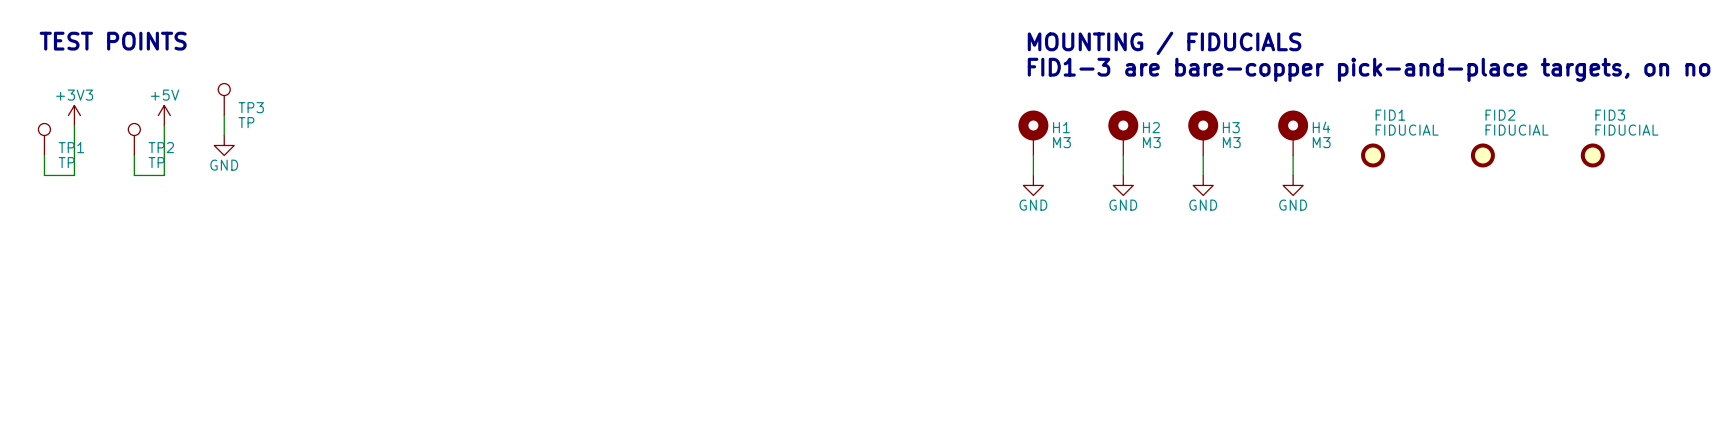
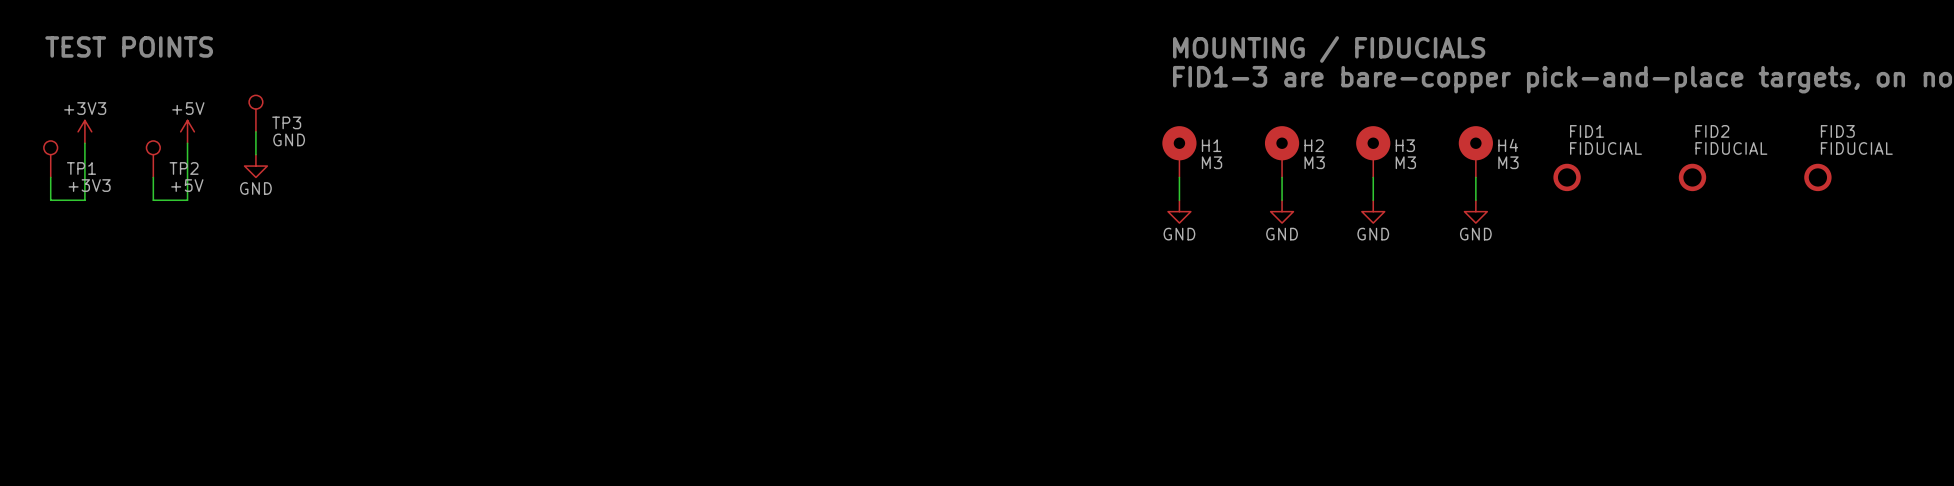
TP3 value: TP (246, 122) -> GND (289, 139)
TP1 value: TP (66, 162) -> +3V3 (89, 185)
TP2 value: TP (156, 162) -> +5V (187, 185)

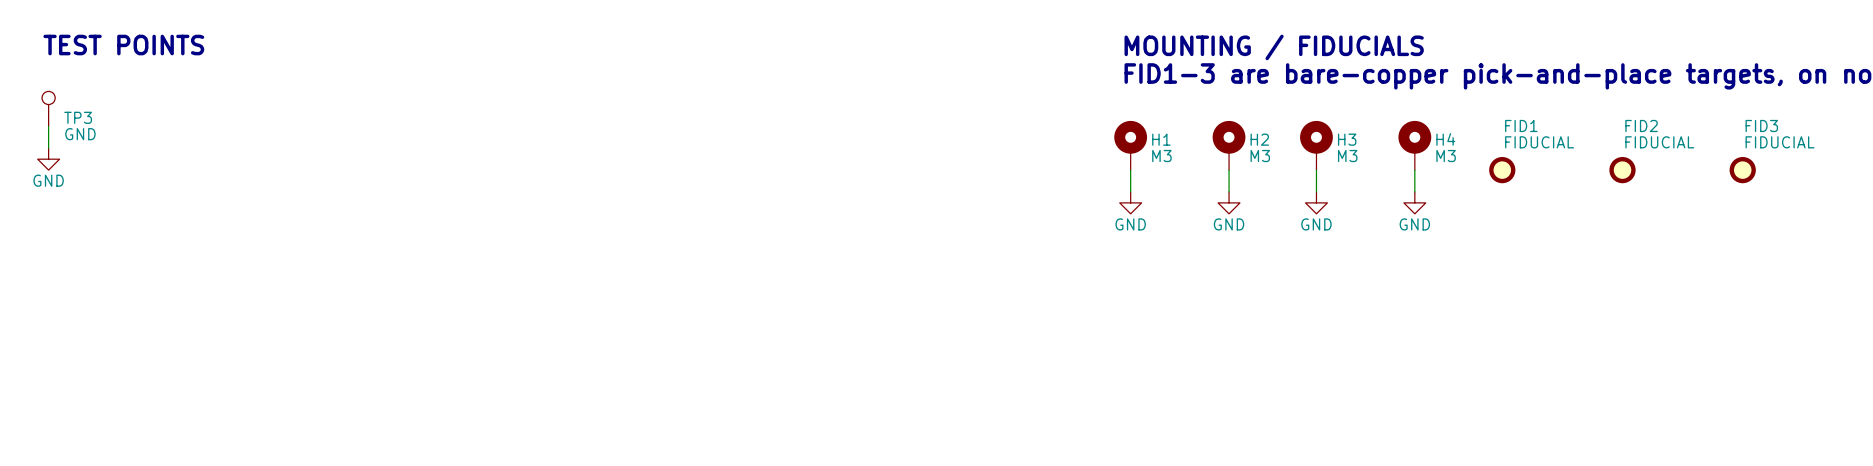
TP3 position: (255, 113) -> (48, 108)
power symbol: +3V3 (84, 131) -> none
power symbol: +5V (187, 131) -> none
wire: (255, 131) (255, 154) -> (48, 126) (48, 148)
wire: (84, 143) (84, 200) (50, 200) (50, 177) -> none
wire: (187, 143) (187, 200) (153, 200) (153, 177) -> none
TP1: +3V3 (50, 159) -> none
TP2: +5V (153, 159) -> none
power symbol position: GND (255, 166) -> GND (48, 159)

